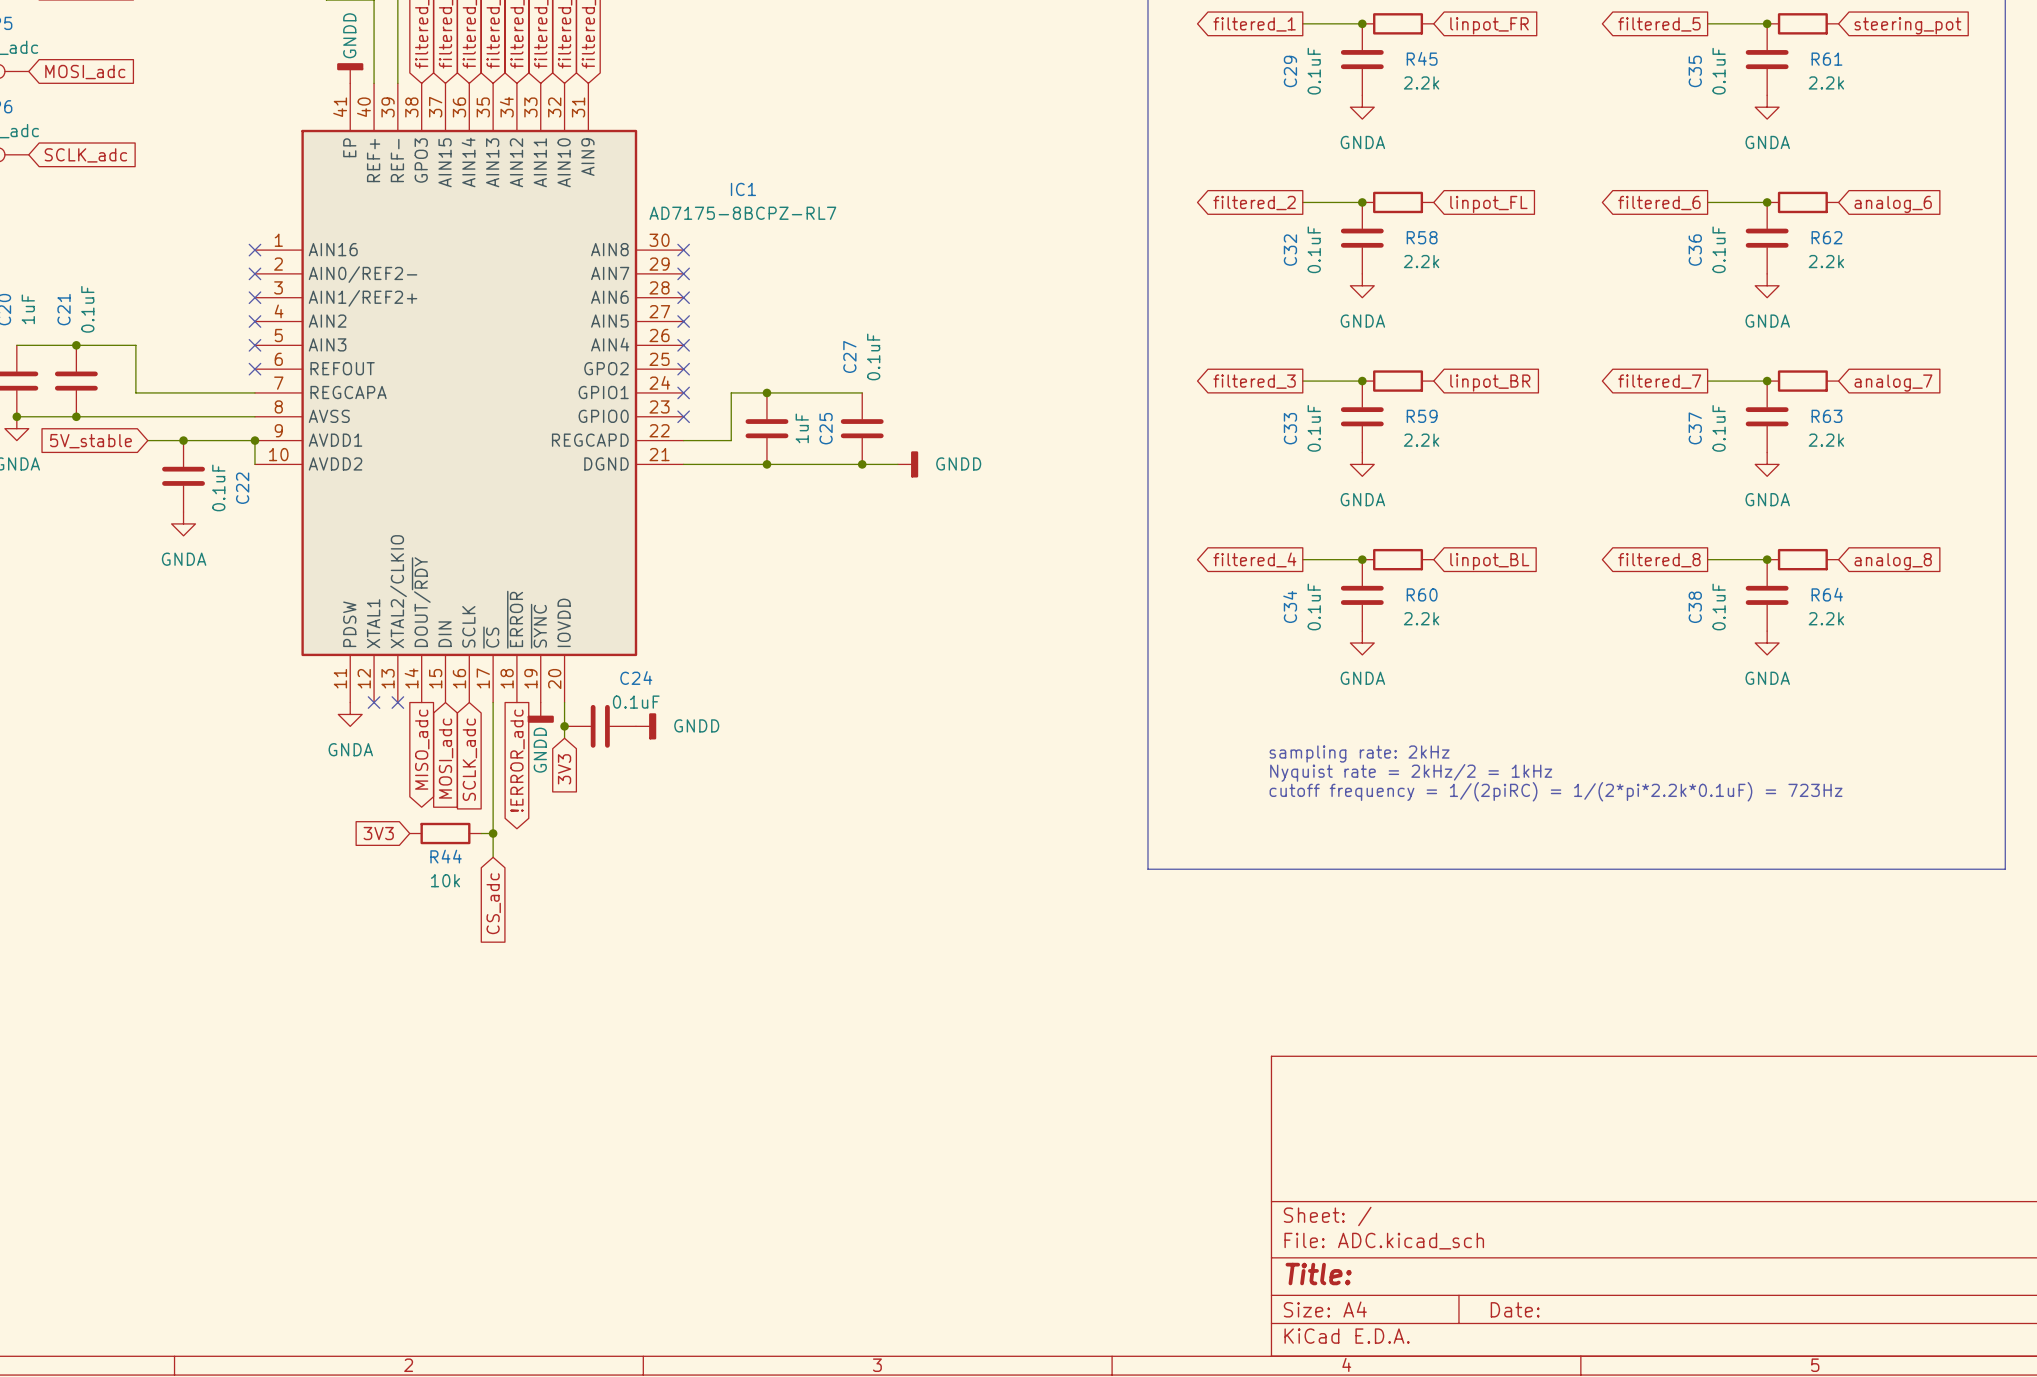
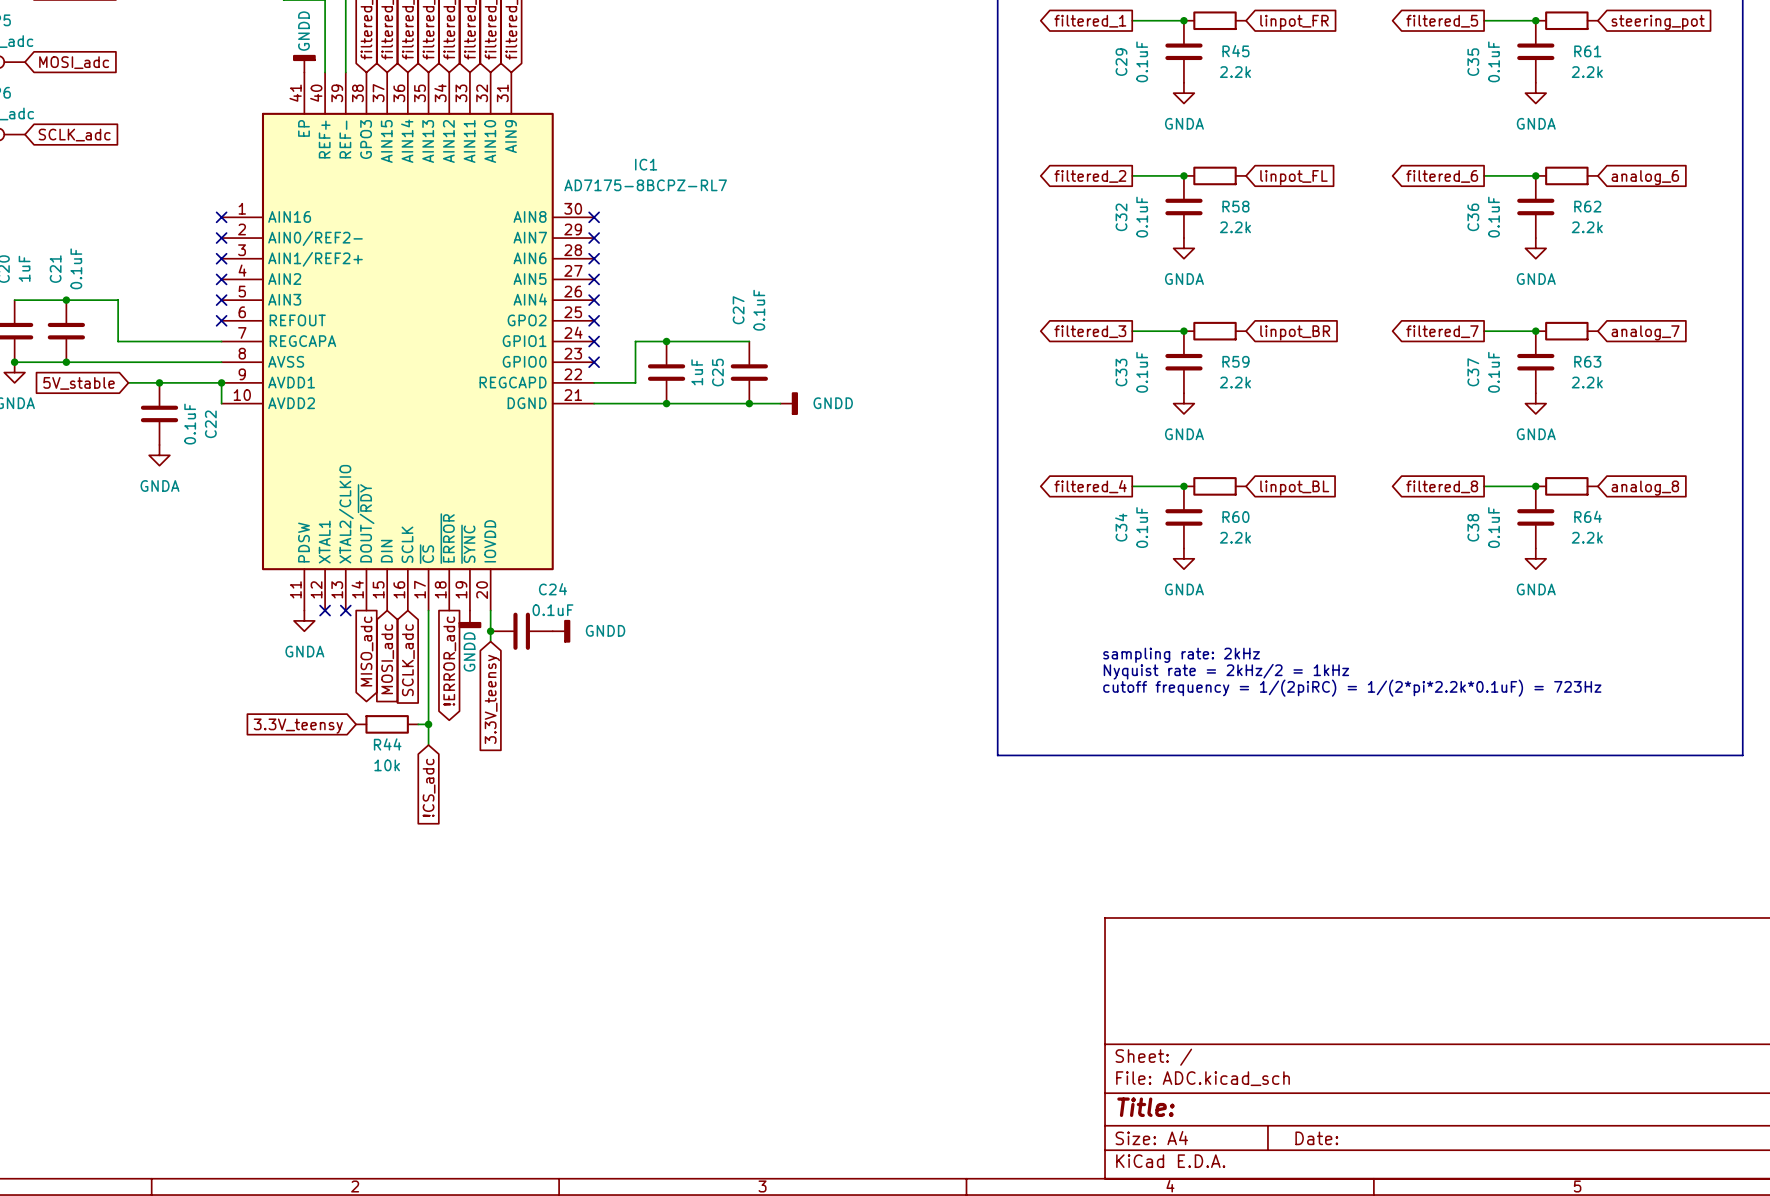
global label: 3V3 (564, 769) -> 3.3V_teensy (492, 699)
global label: 3V3 (378, 833) -> 3.3V_teensy (298, 726)
global label: CS_adc (493, 903) -> !CS_adc (429, 787)

